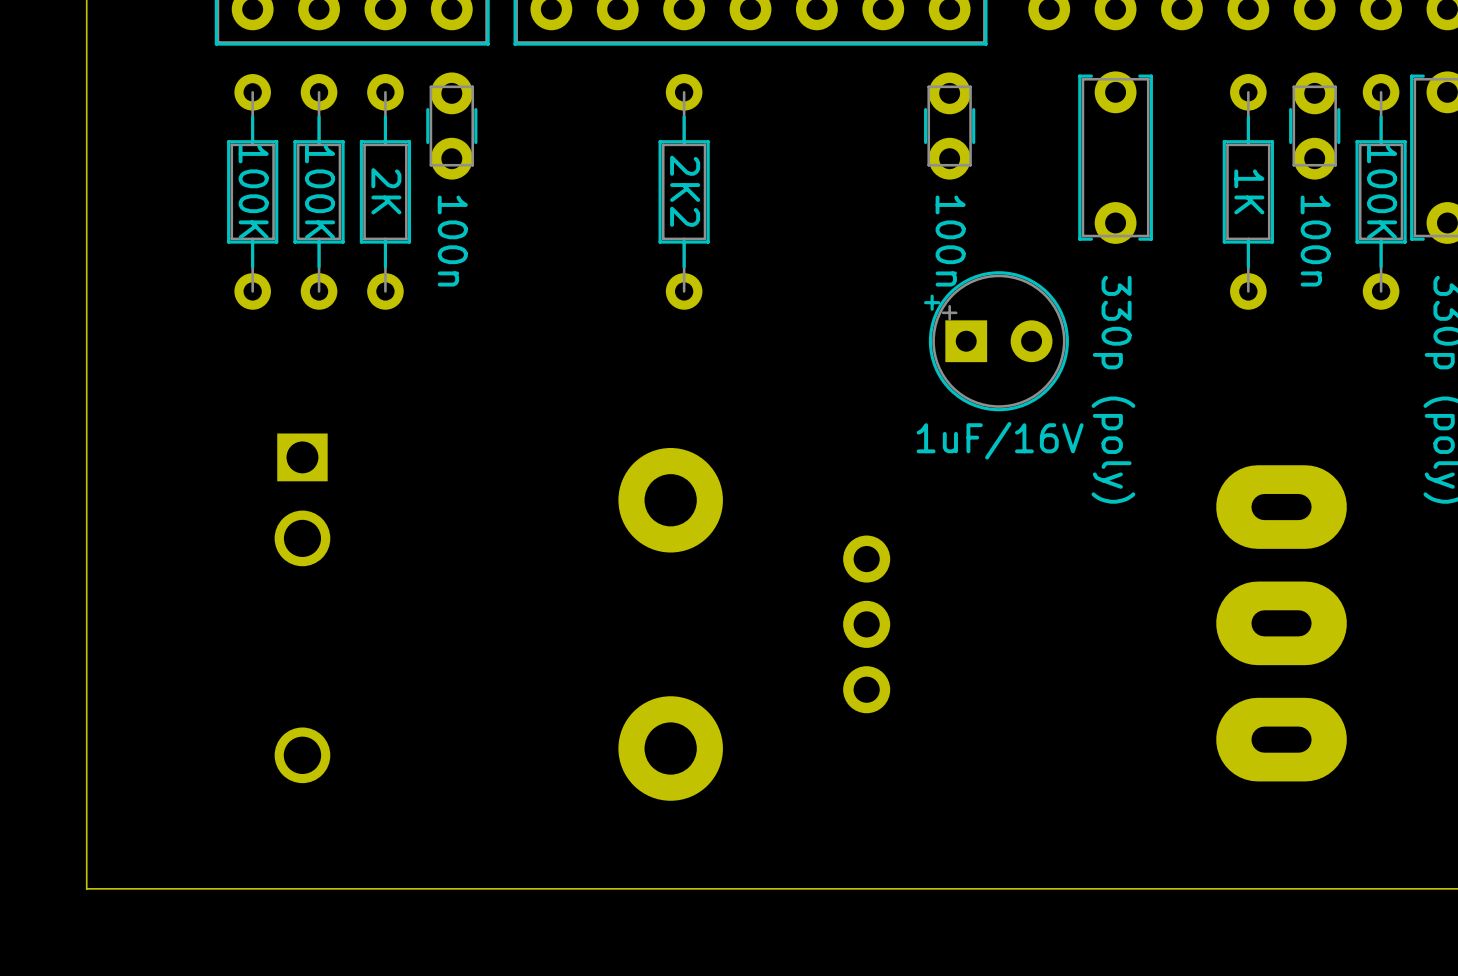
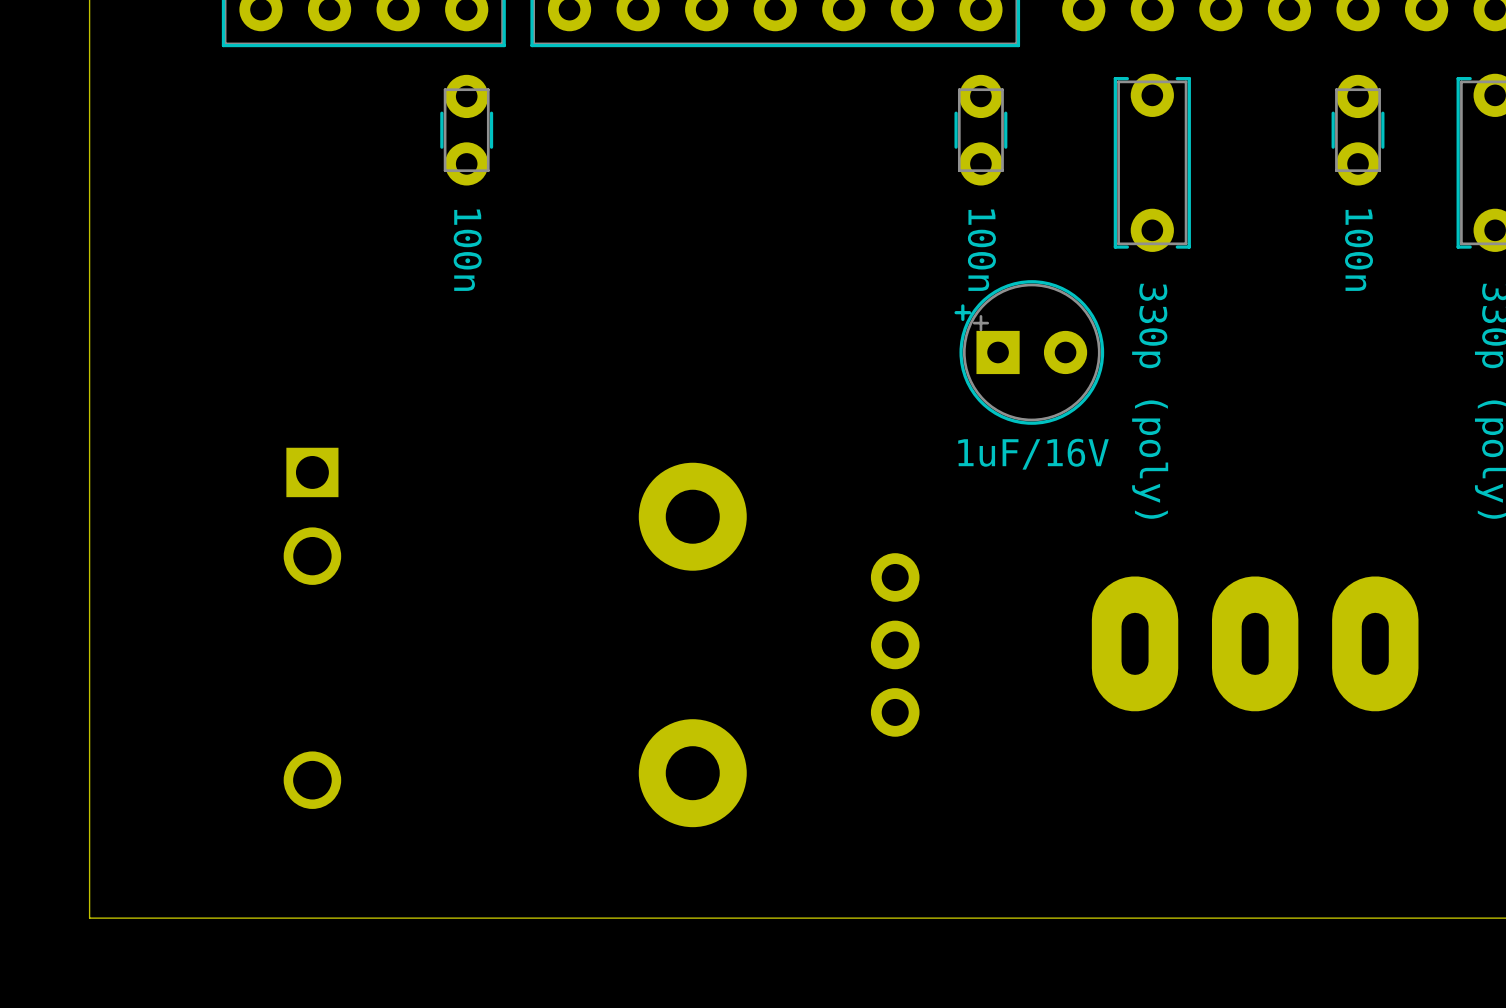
part: 100K (252, 191) -> none
part: 100K (319, 191) -> none
part: 2K (385, 191) -> none
part: 2K2 (684, 191) -> none
part: 1K (1248, 191) -> none
part: 100K (1381, 191) -> none
part rotation: 0° (1281, 623) -> 90° clockwise (1255, 643)

